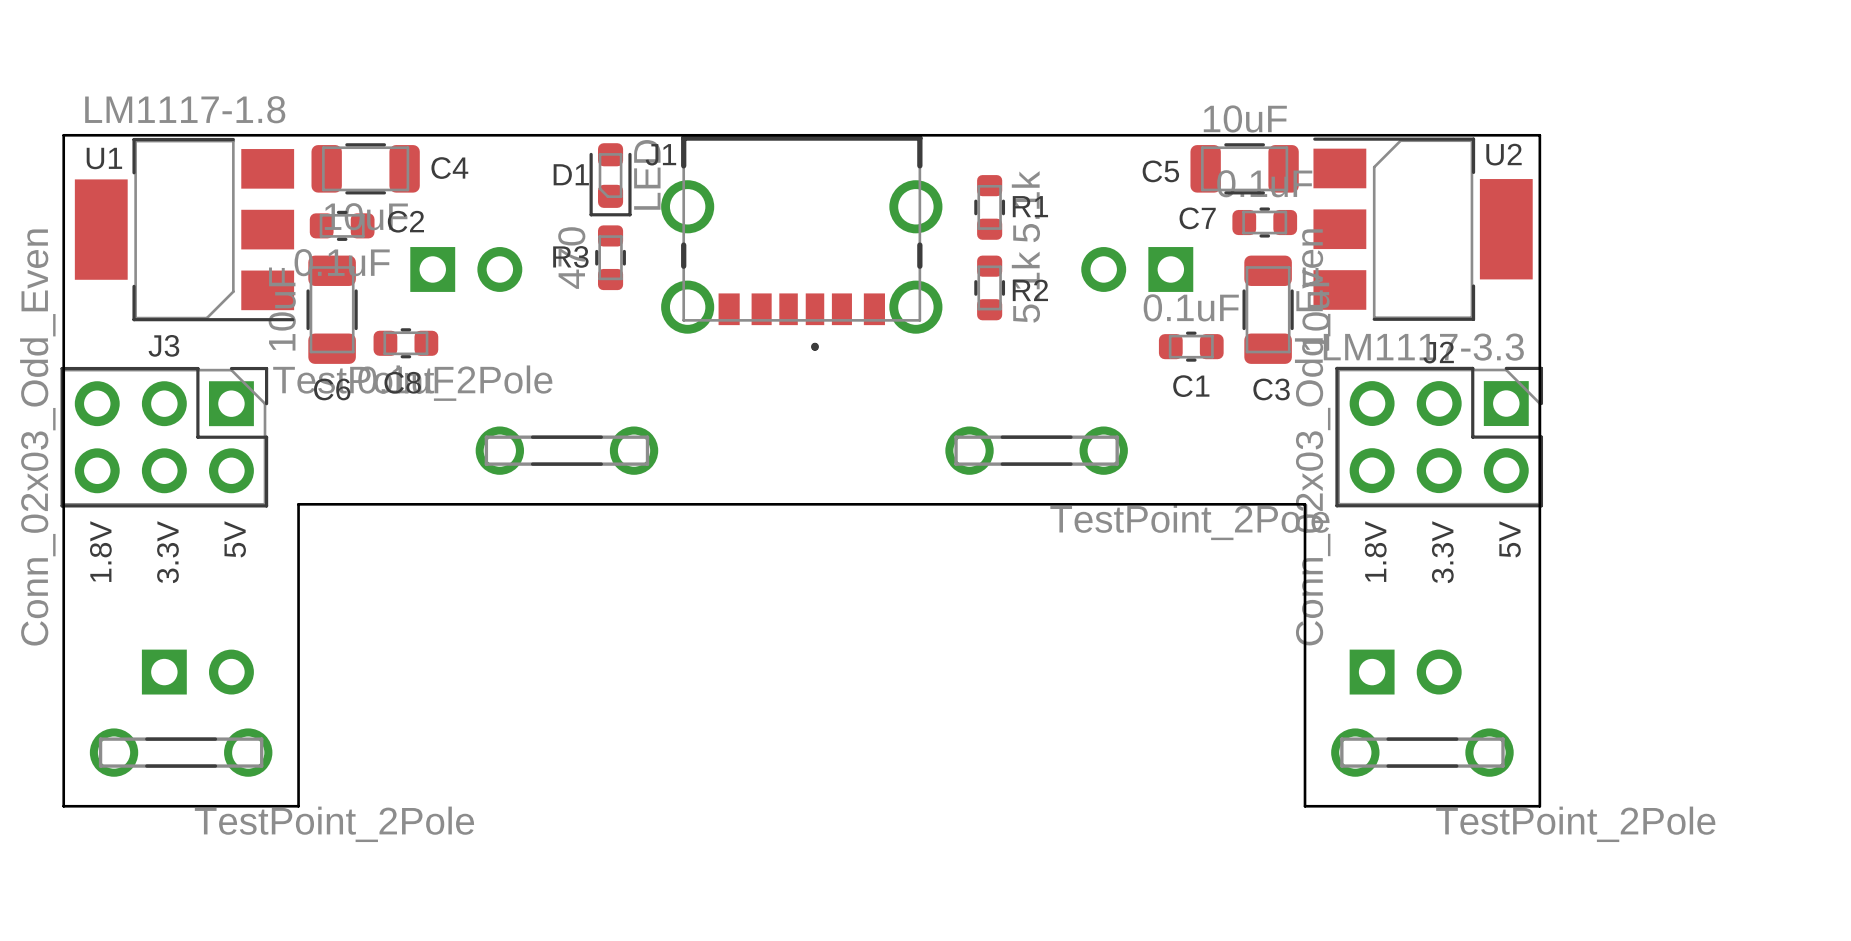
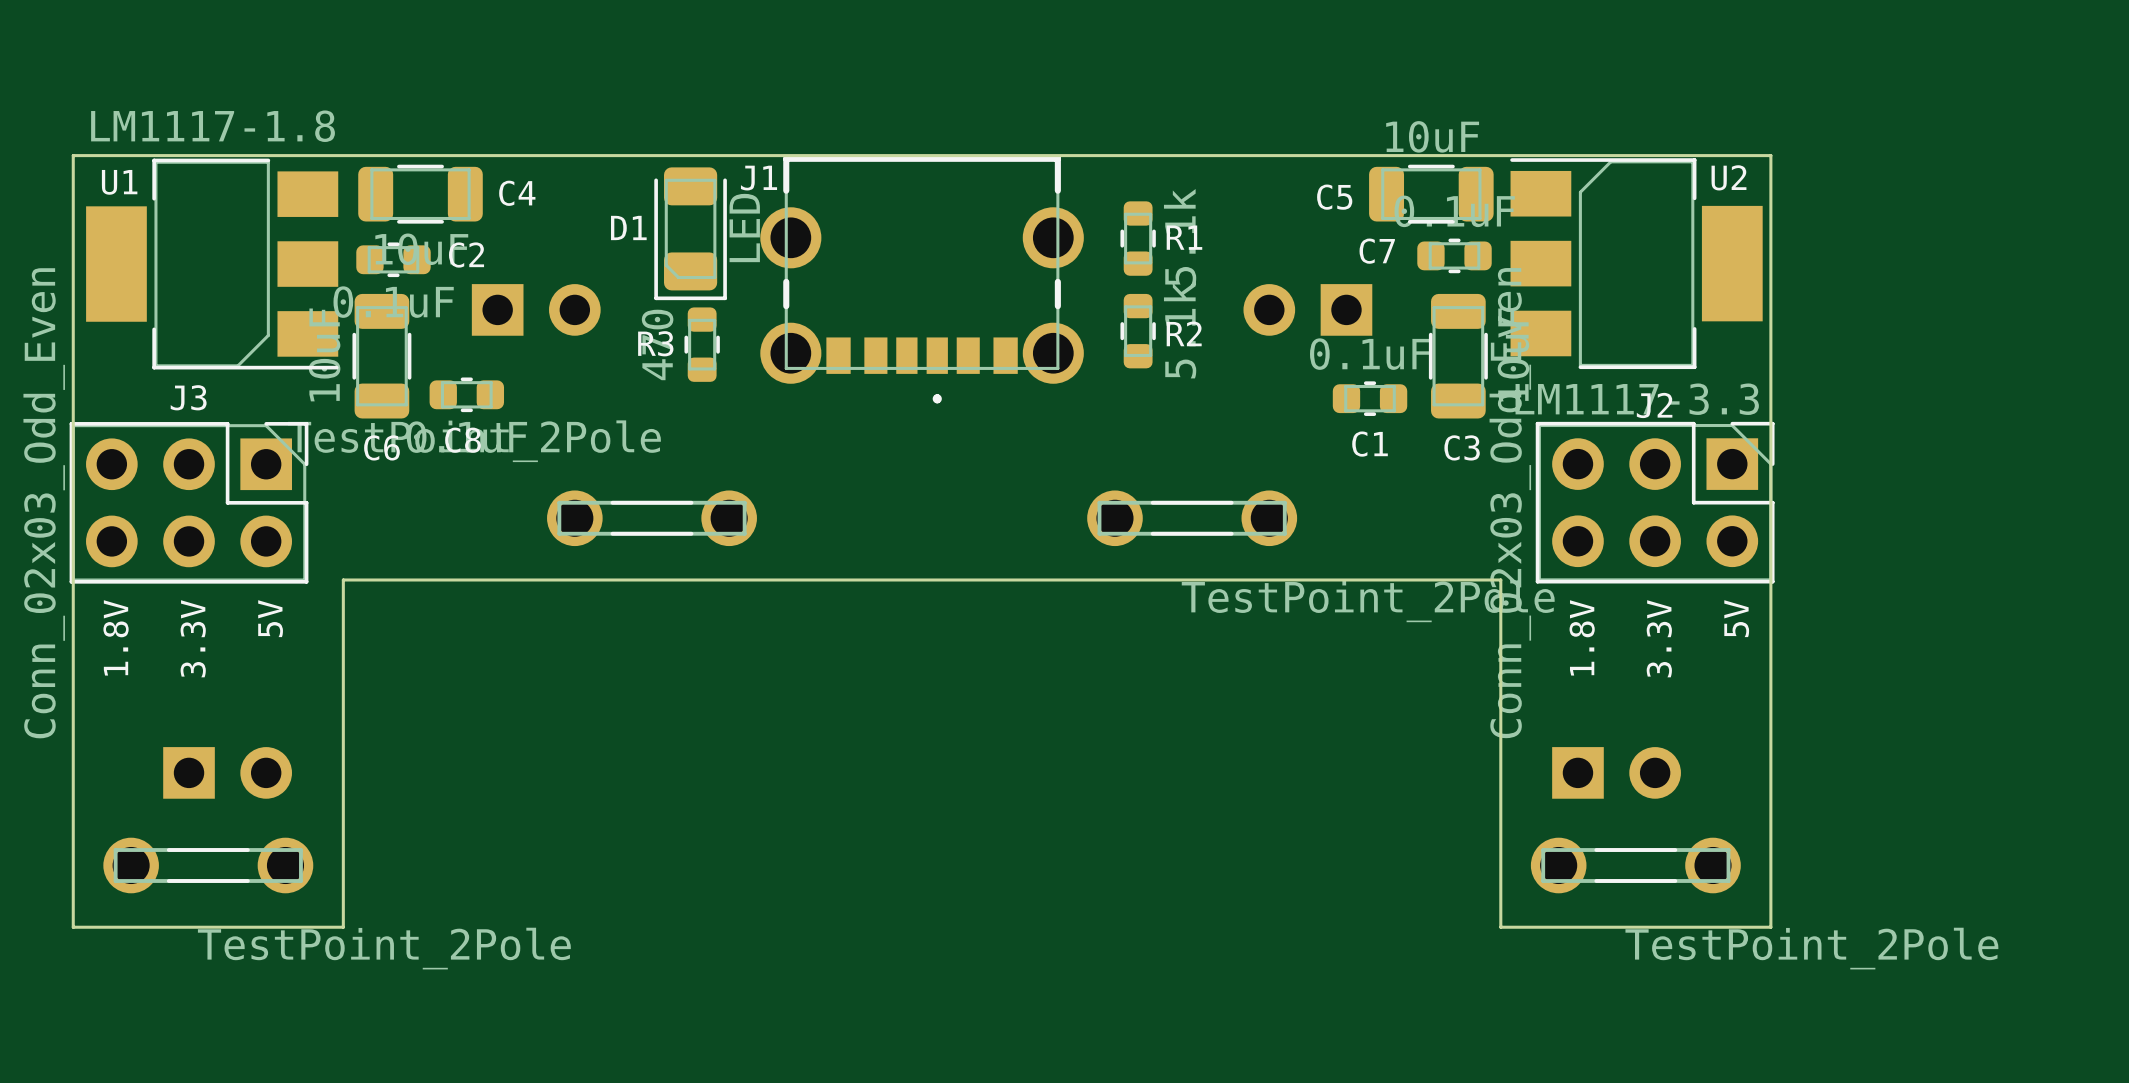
D1 footprint: [589, 143, 632, 217] -> [654, 167, 727, 301]
R3 position: (610, 257) -> (702, 344)

